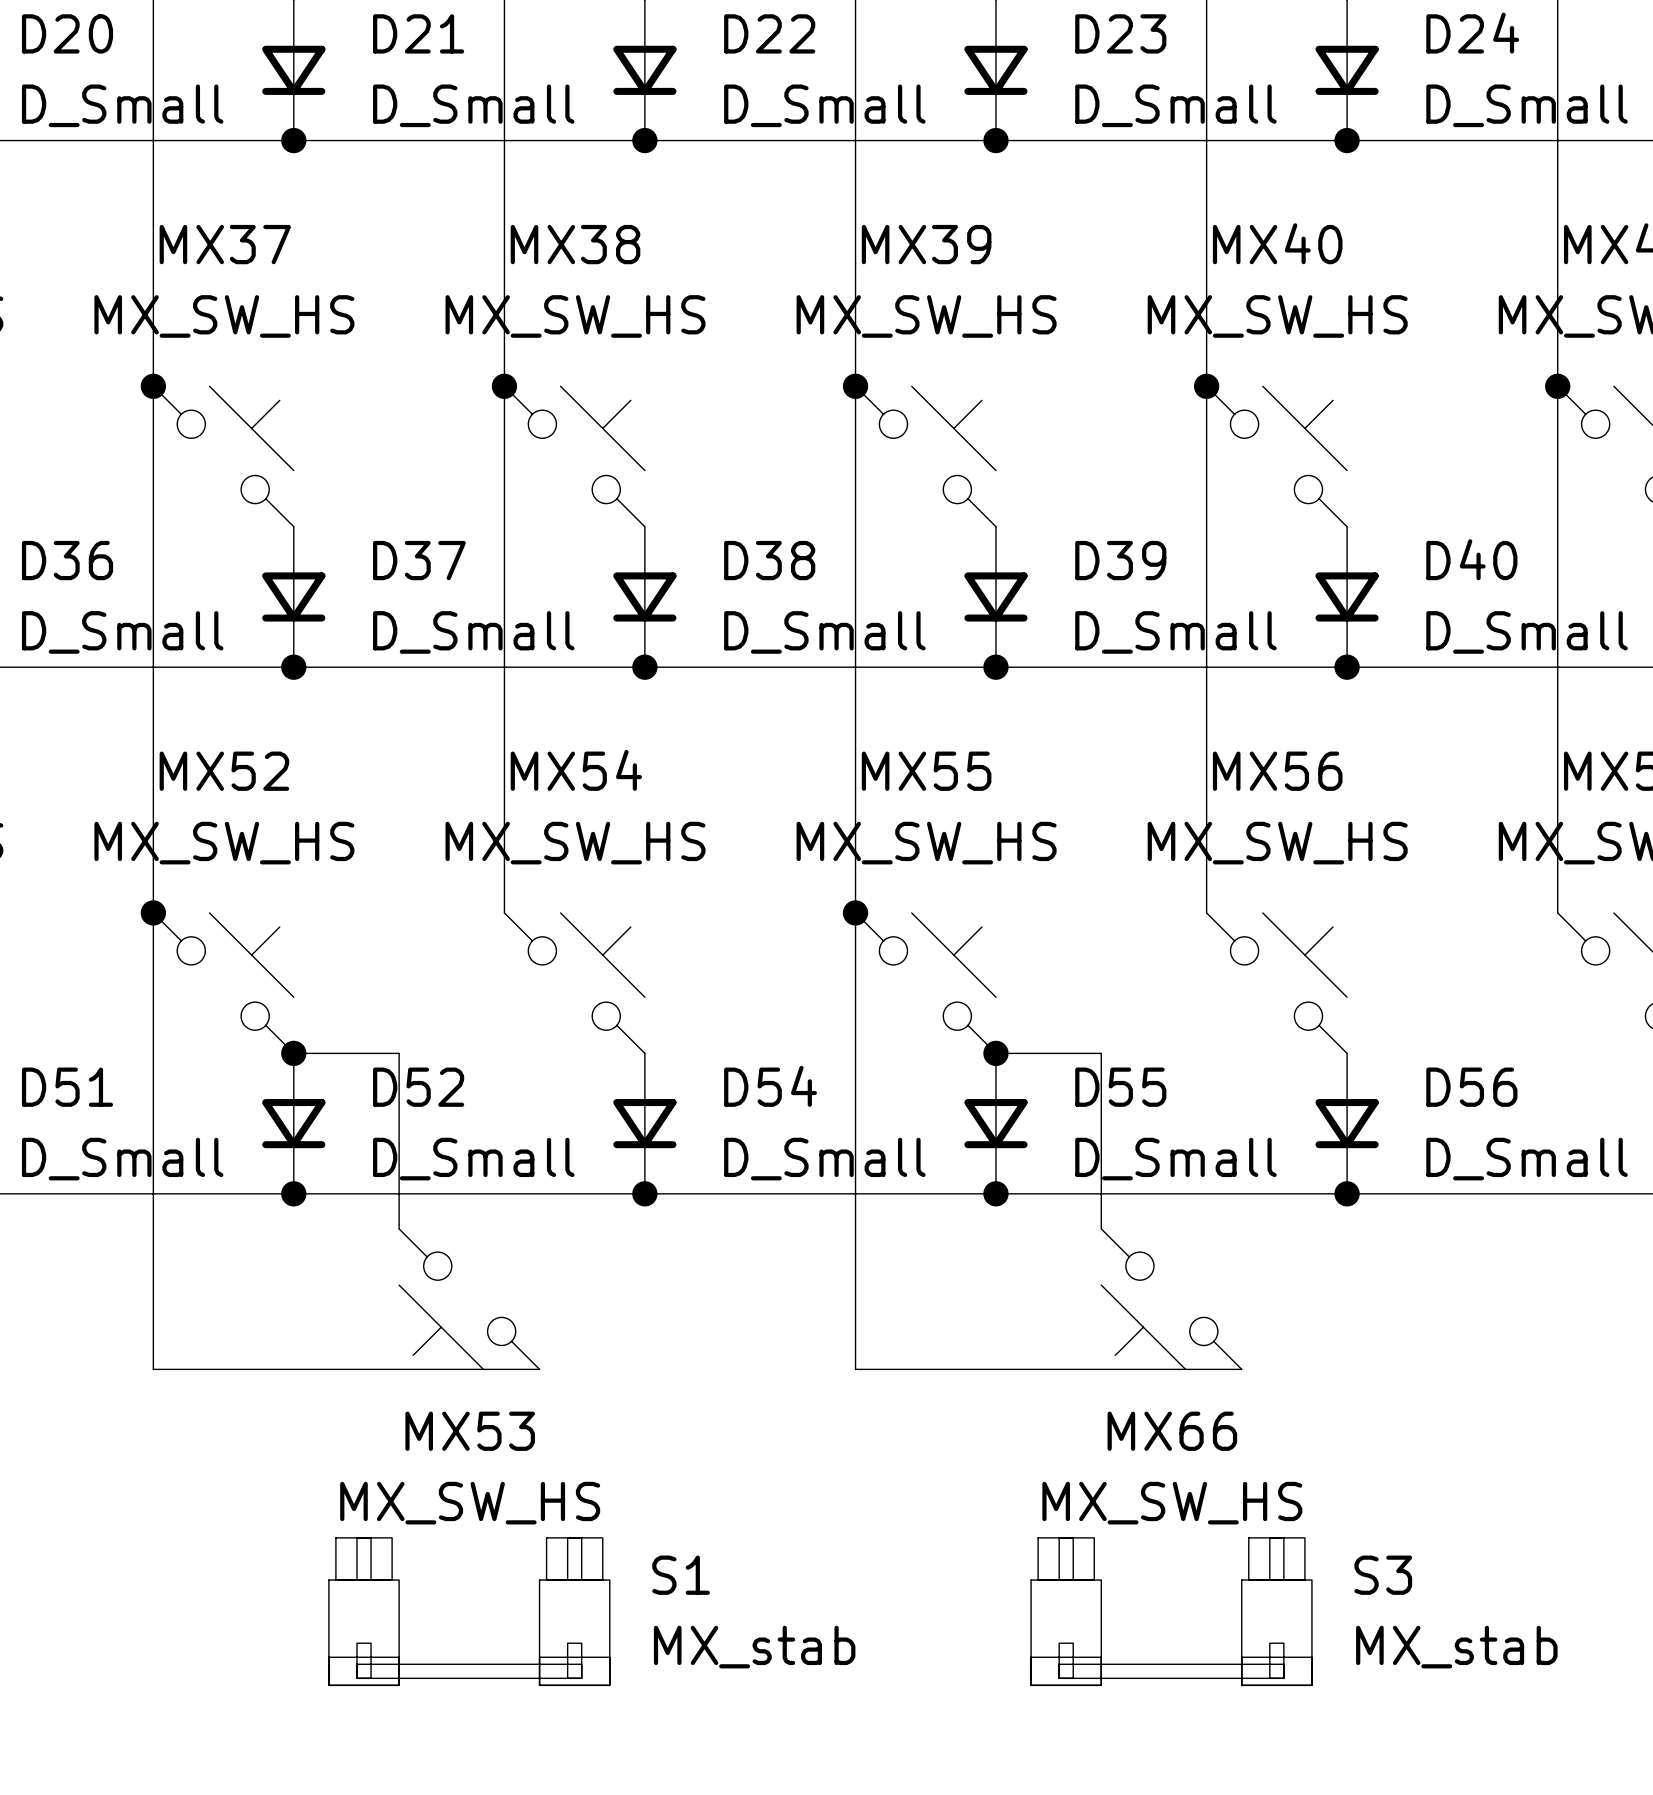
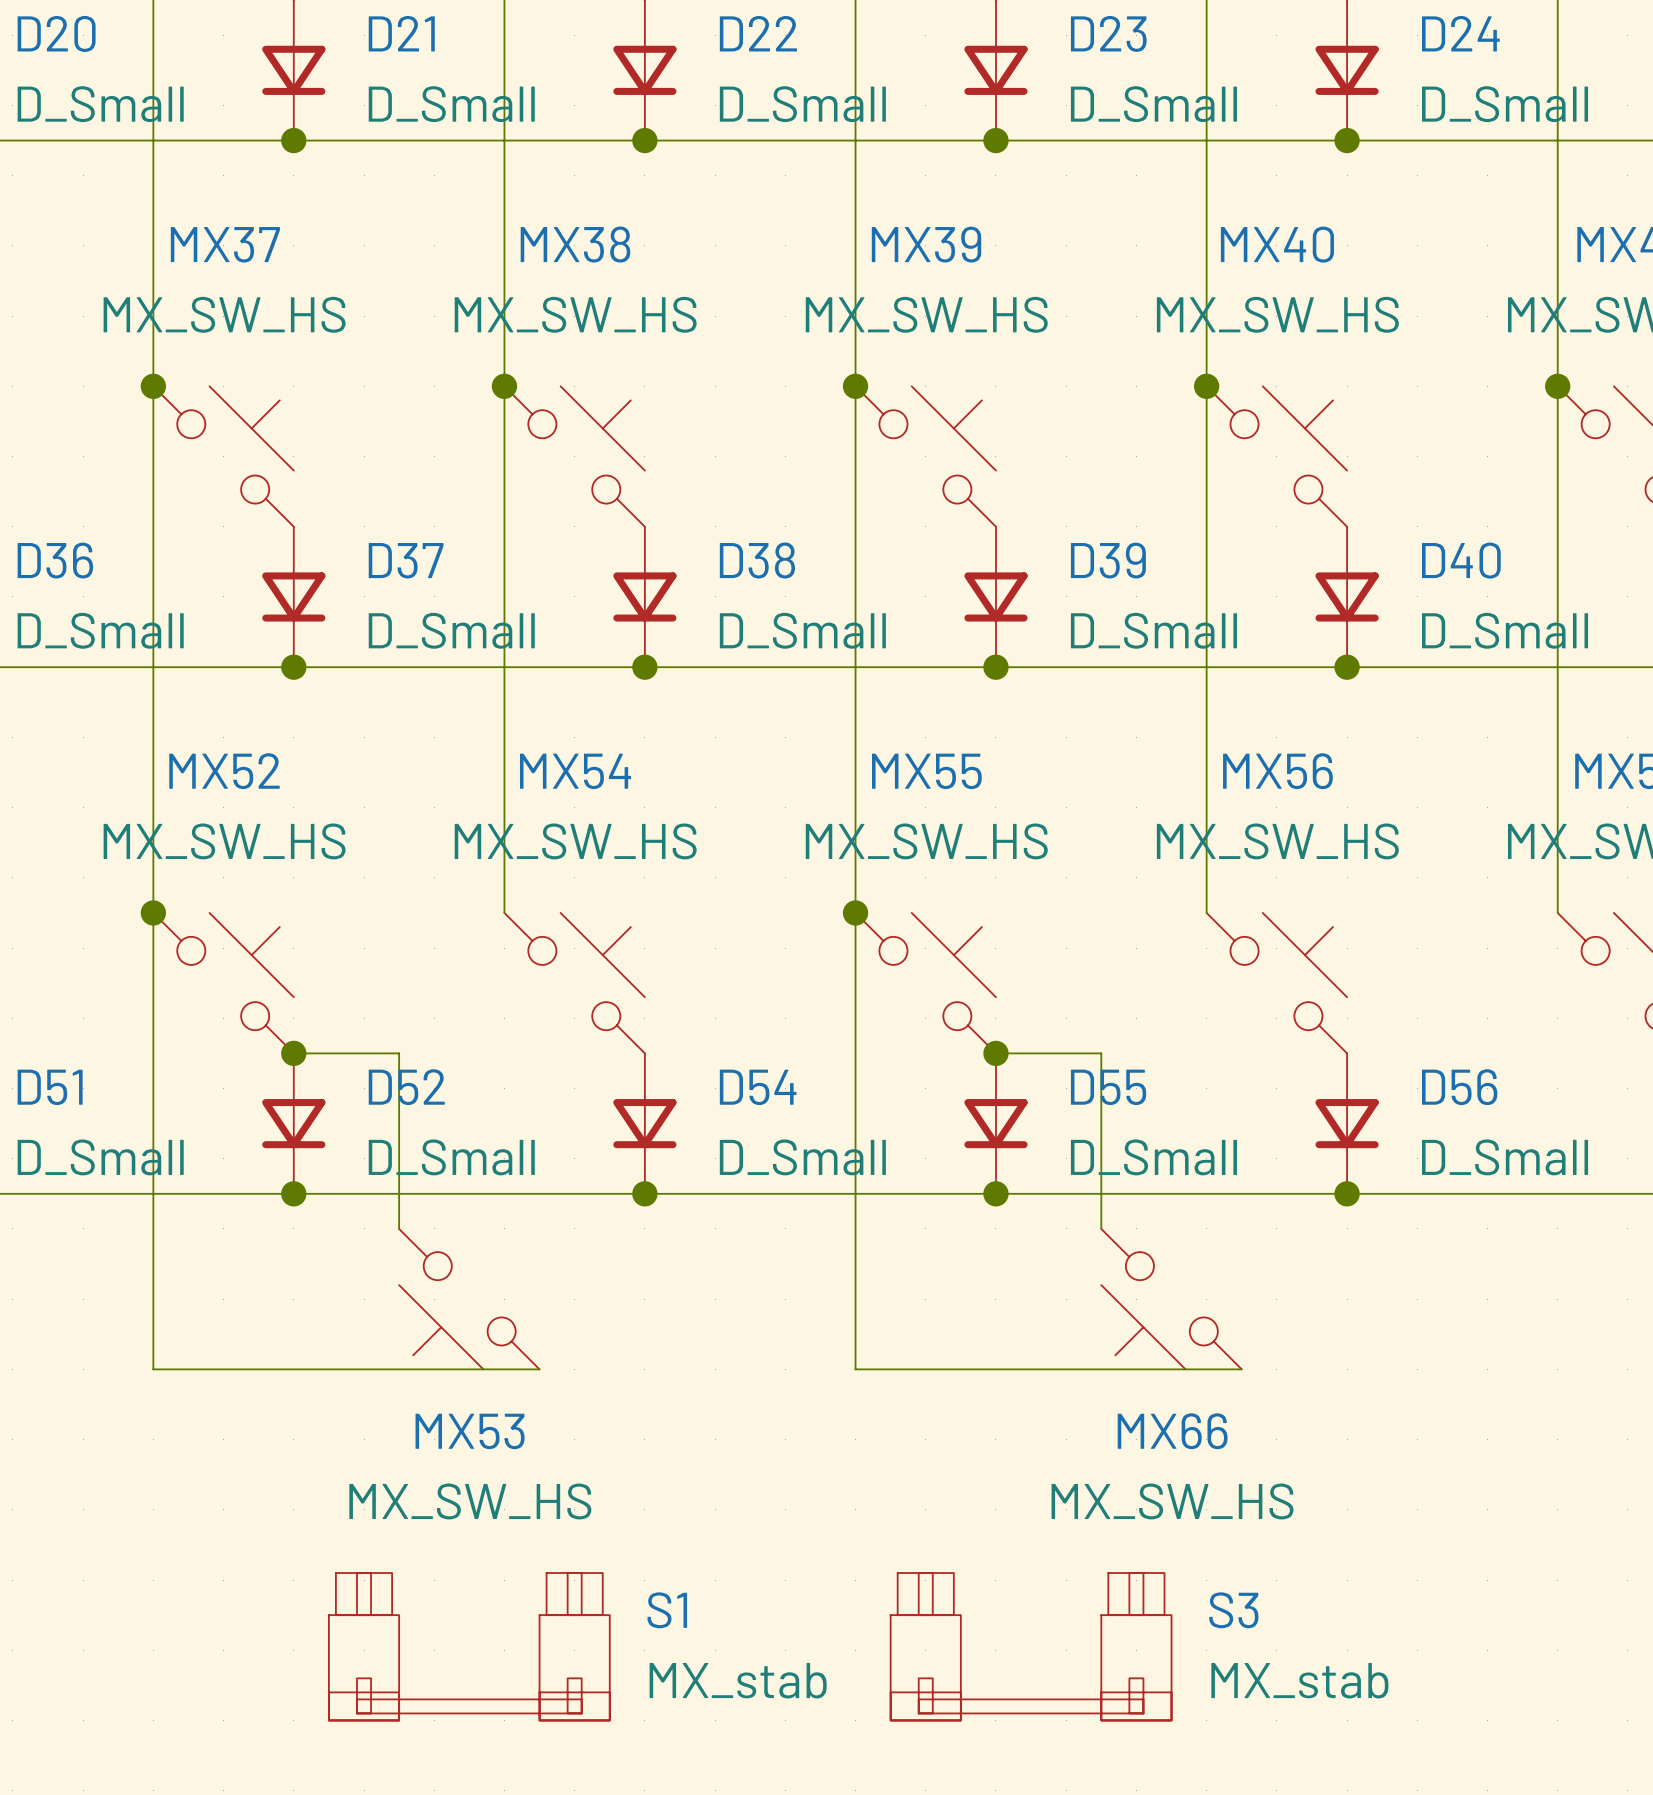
S1 position: (469, 1611) -> (469, 1646)
S3 position: (1171, 1611) -> (1031, 1646)

